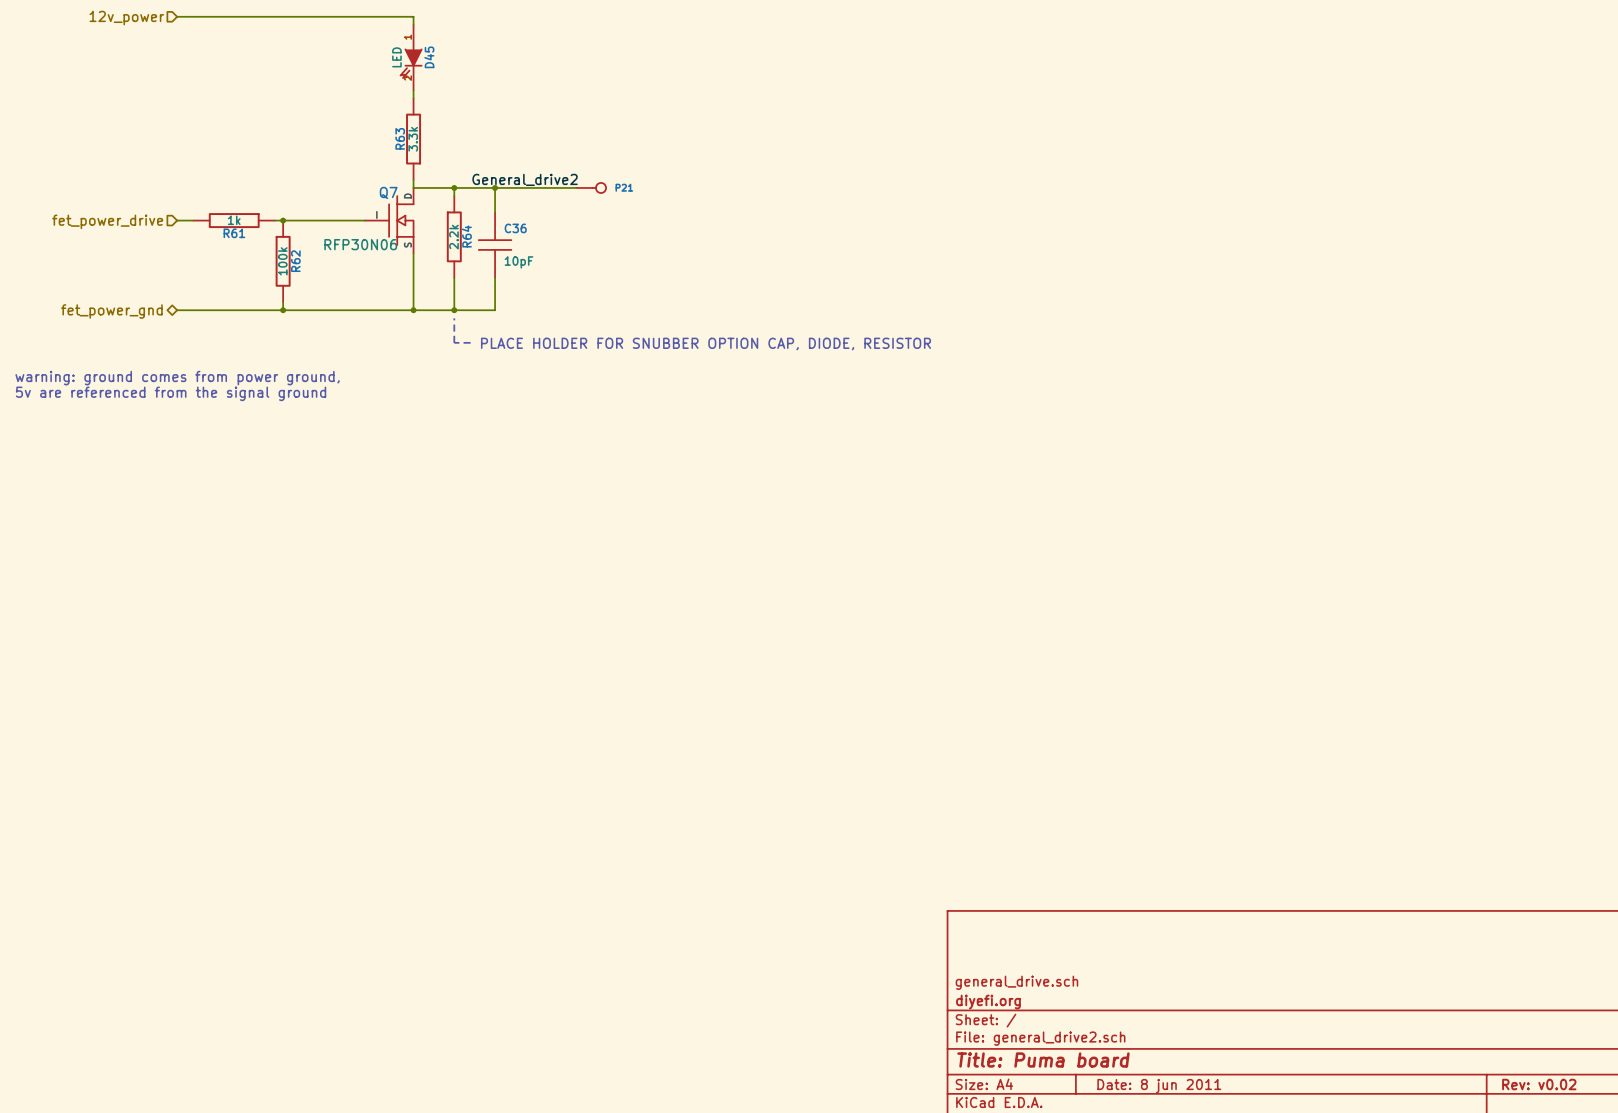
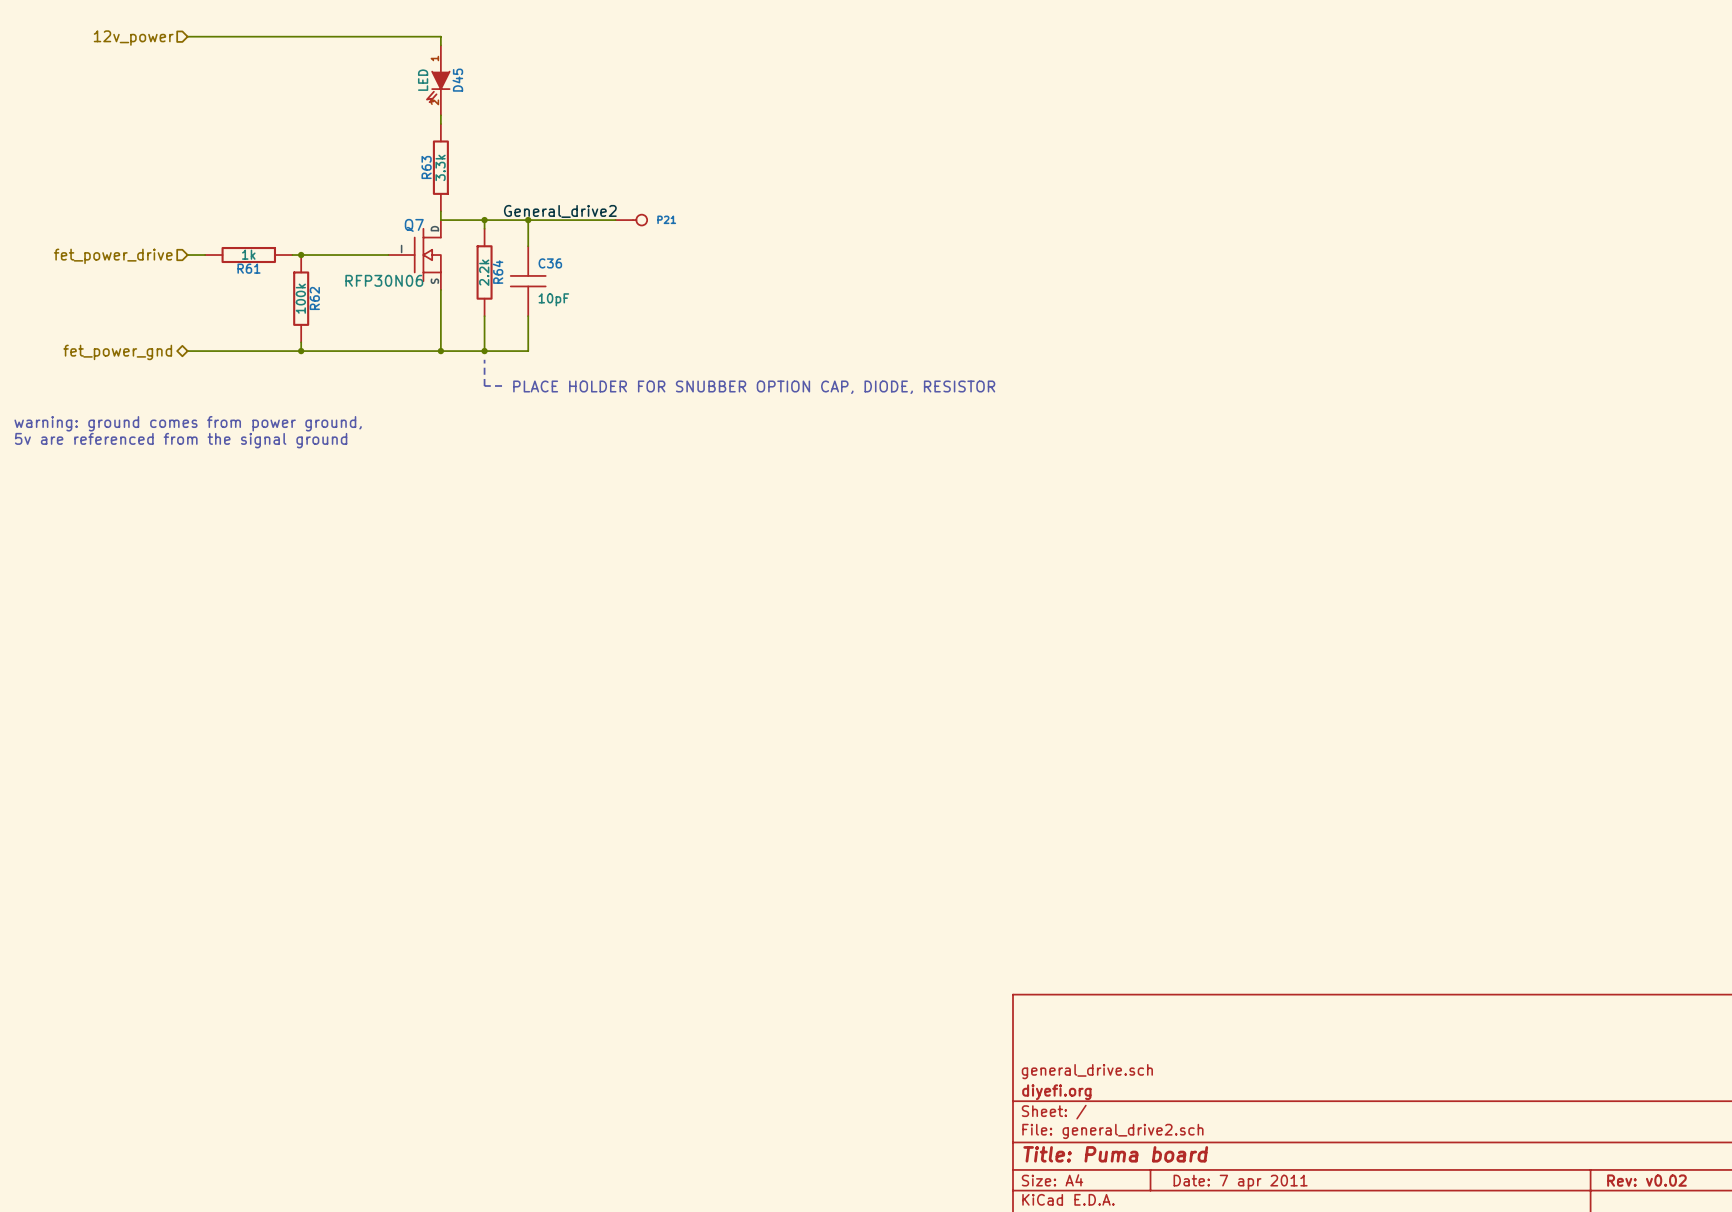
title block: Date: 8 jun 2011 (1159, 1086) -> Date: 7 apr 2011 (1240, 1182)

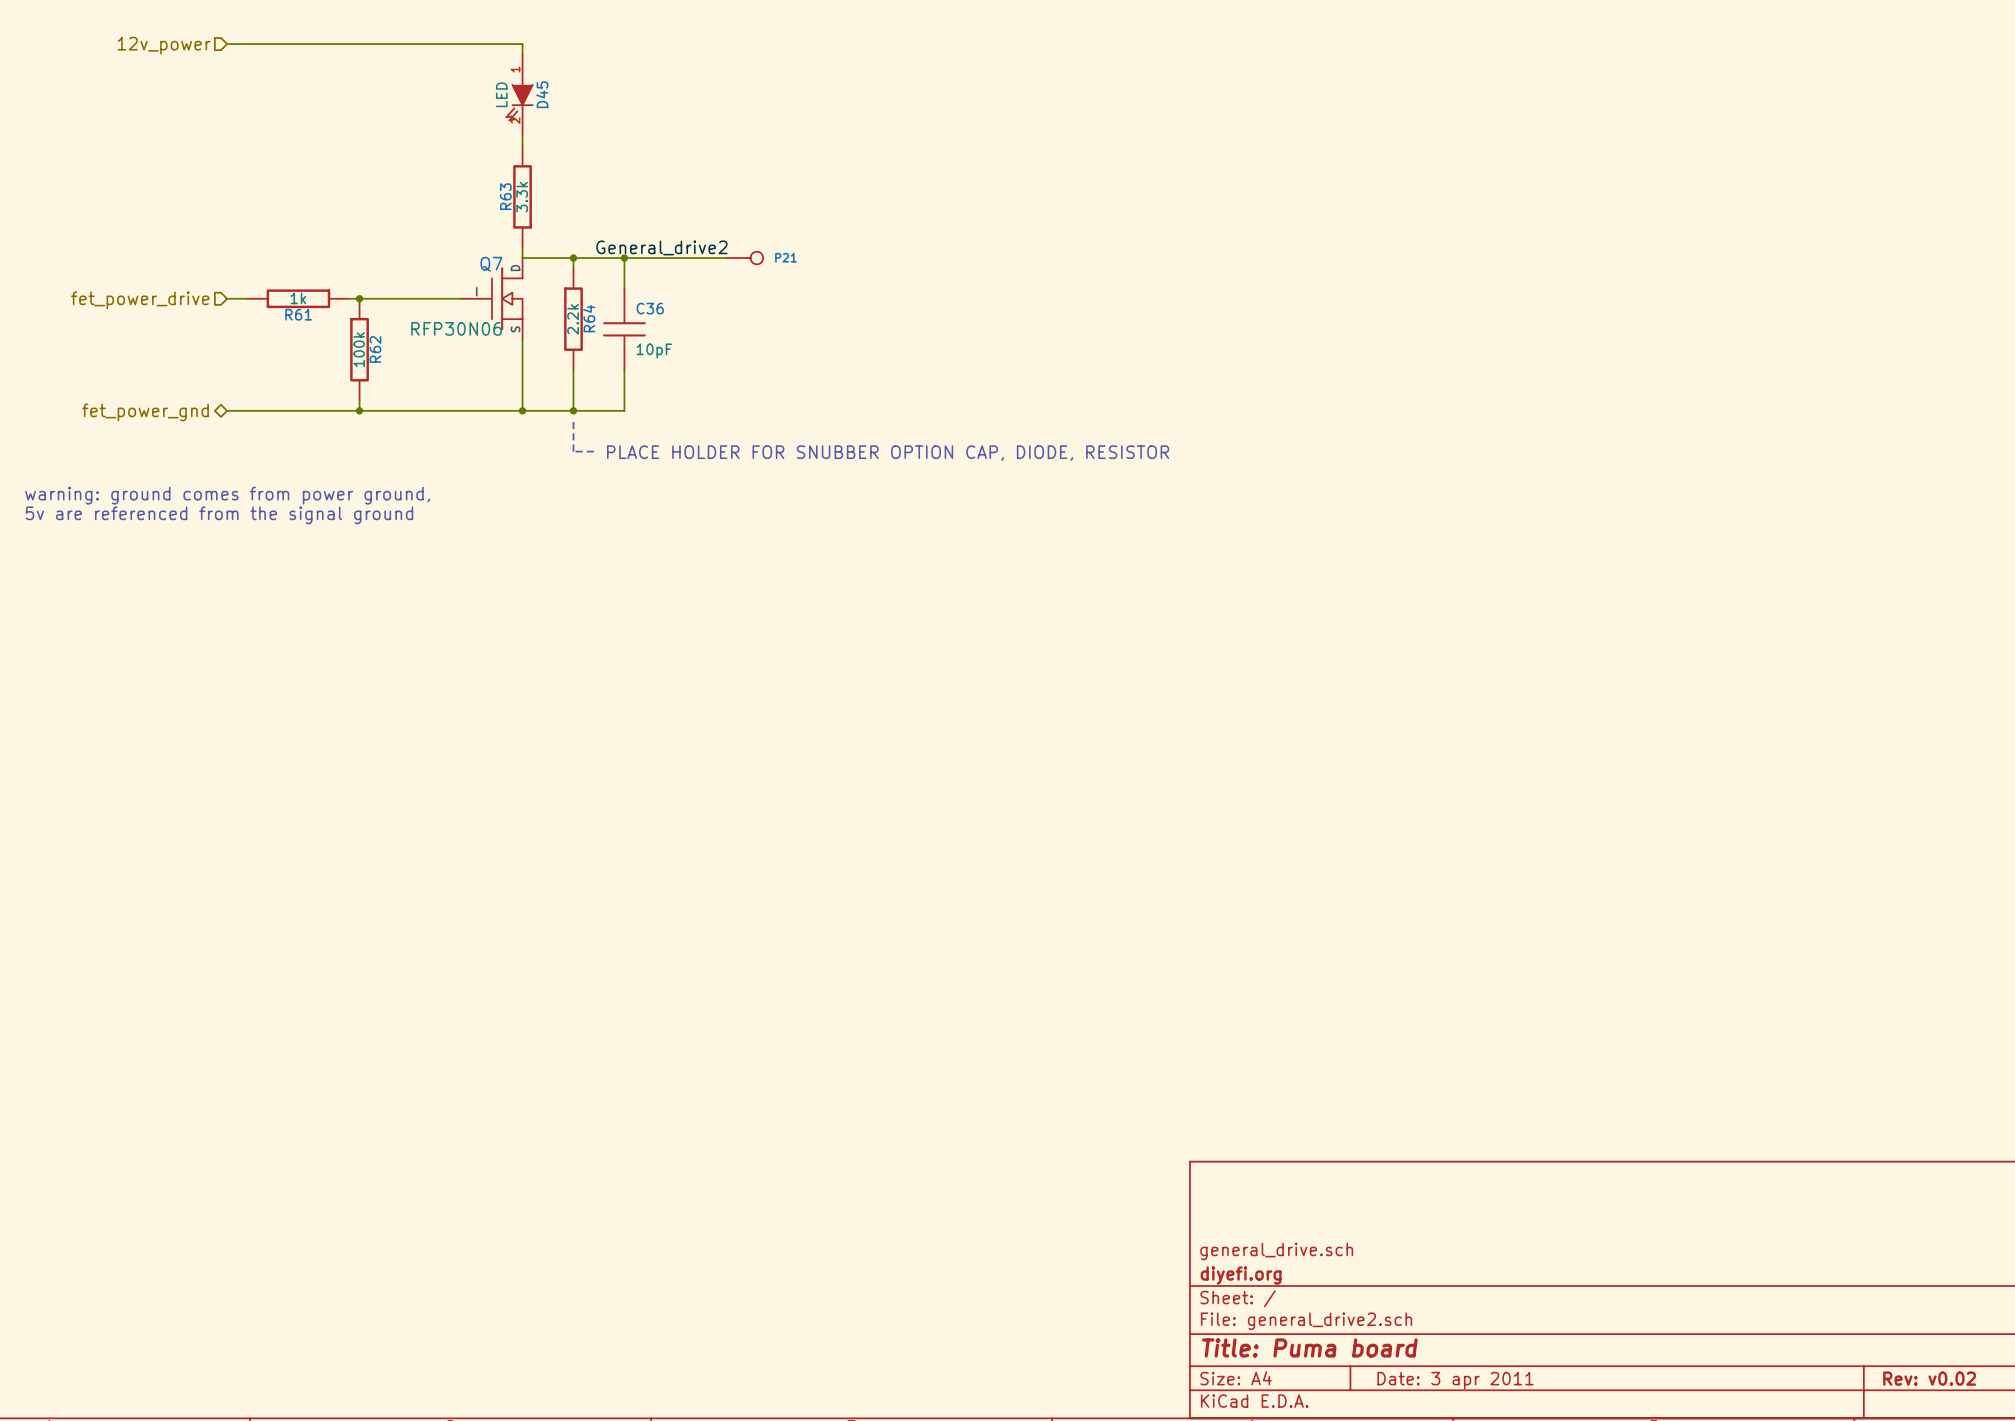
title block: Date: 7 apr 2011 (1240, 1182) -> Date: 3 apr 2011 (1455, 1380)

